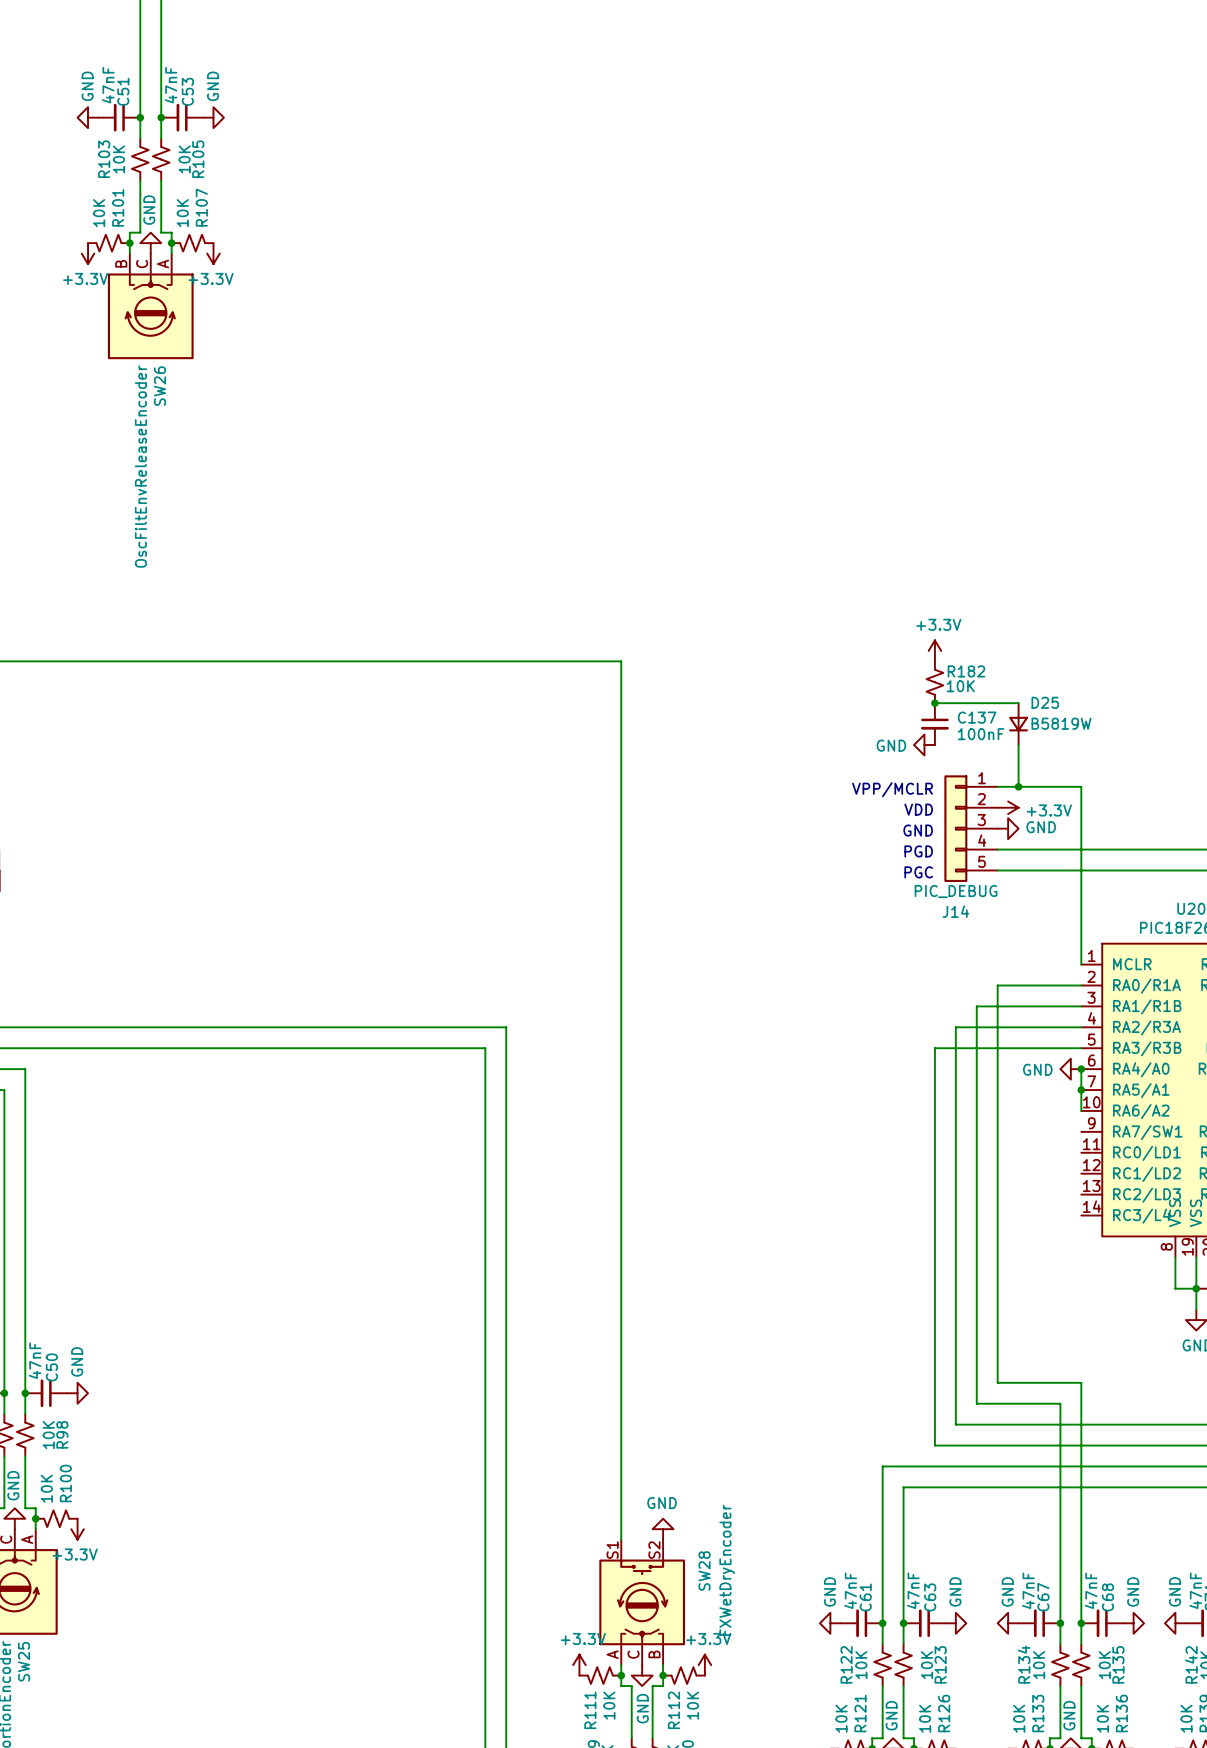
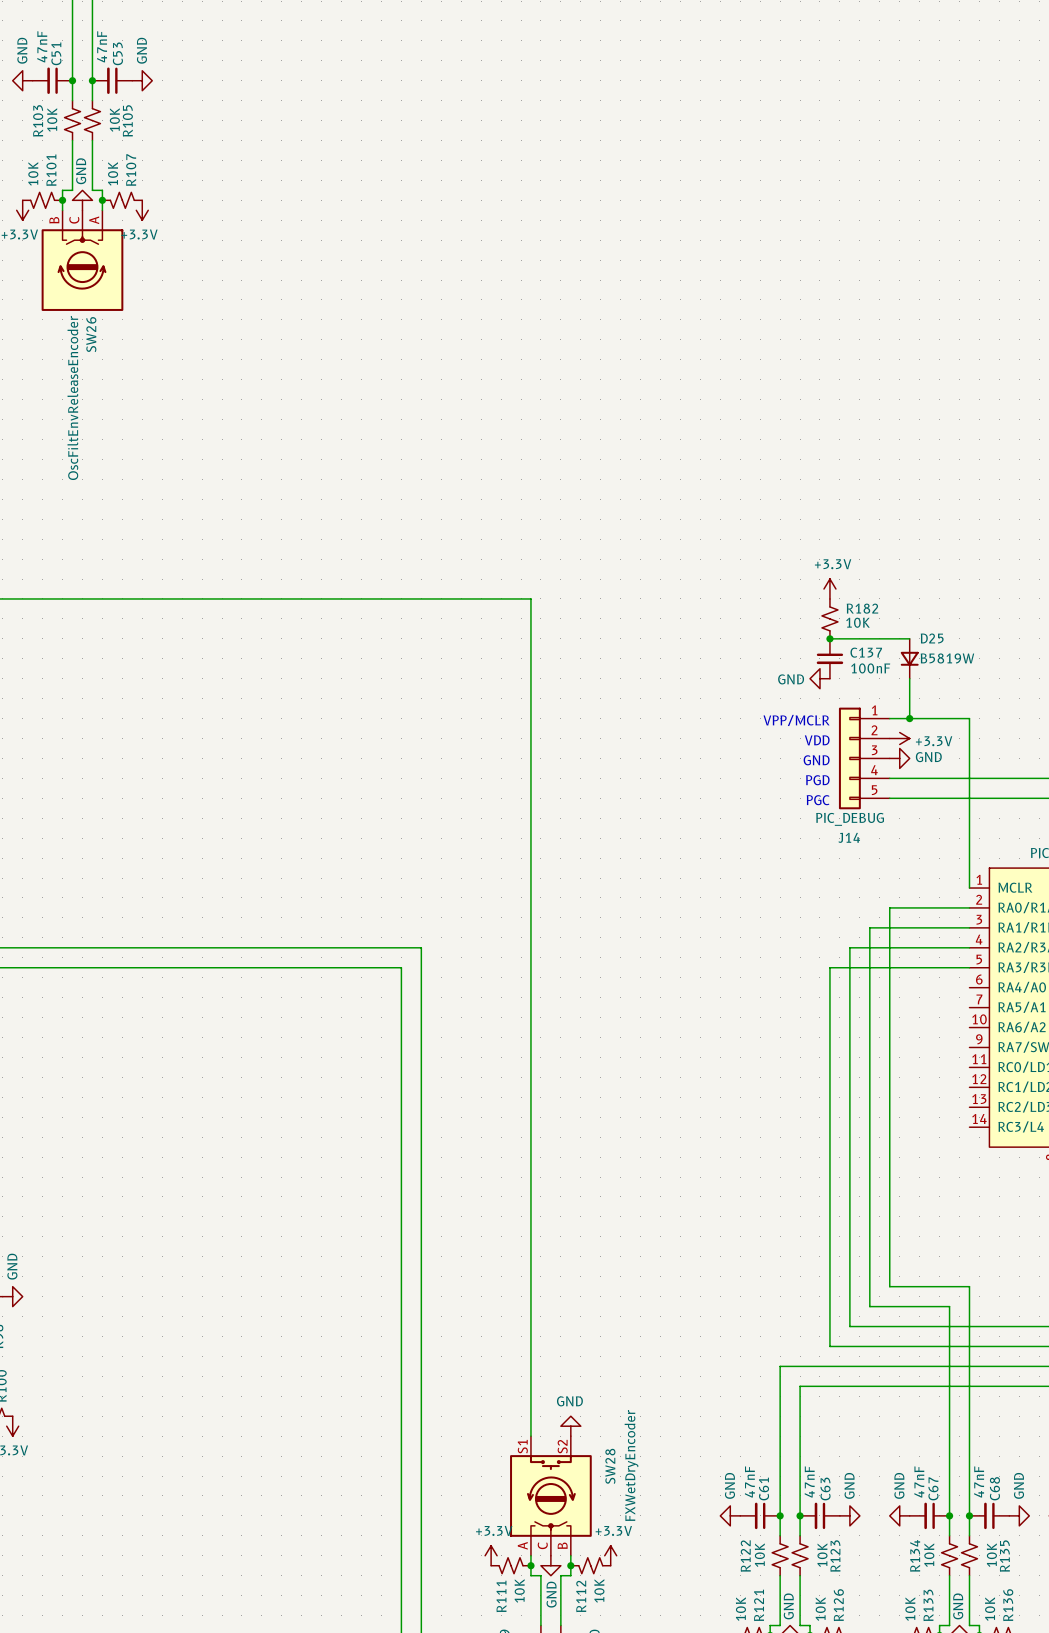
power symbol: GND (1070, 1069) -> none
wire: (1081, 1069) (1081, 1110) -> none
junction: (1081, 1069) -> none
junction: (1081, 1090) -> none

